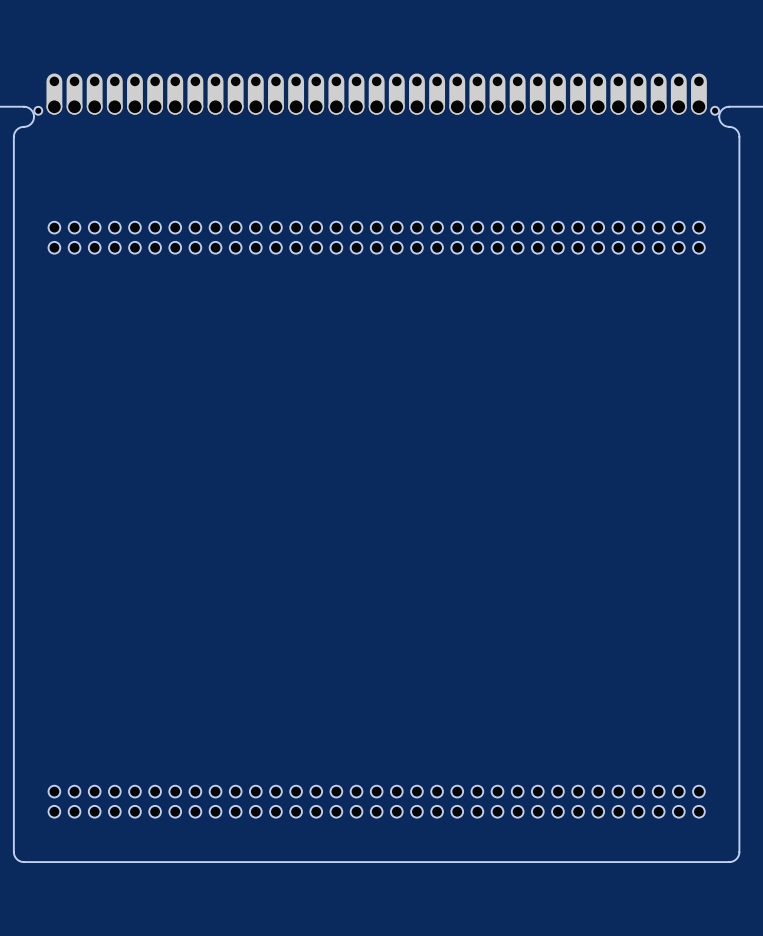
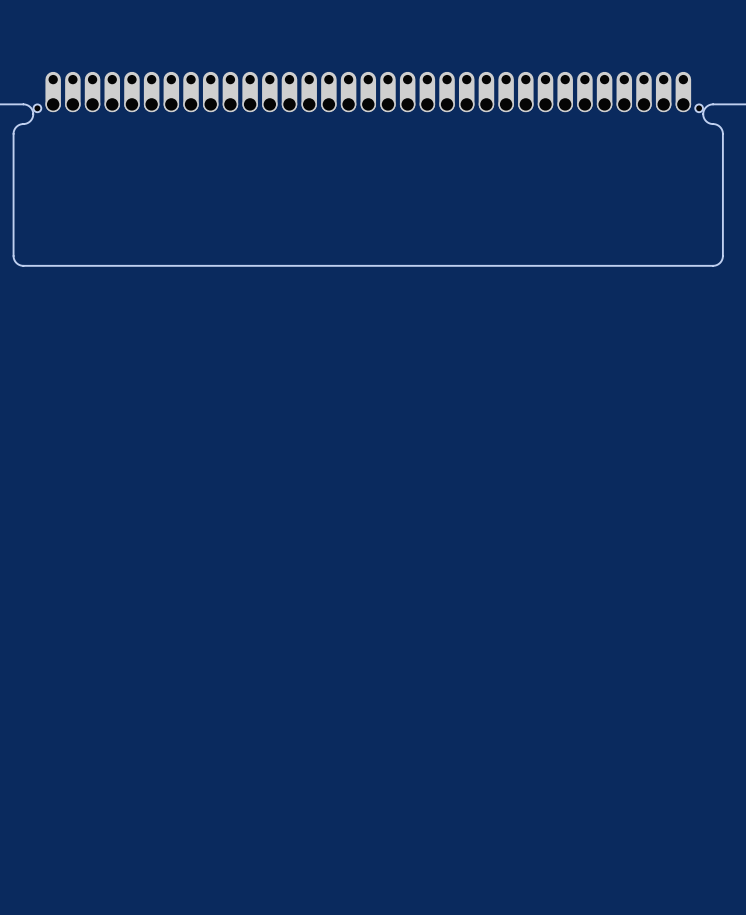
part: (376, 237) -> none
board edge: (739, 261) (739, 851) (736, 859) (729, 862) (23, 862) (17, 859) (13, 851) (13, 261) -> (722, 255) (720, 262) (713, 265) (23, 265) (16, 262) (13, 255)
part: (376, 801) -> none

